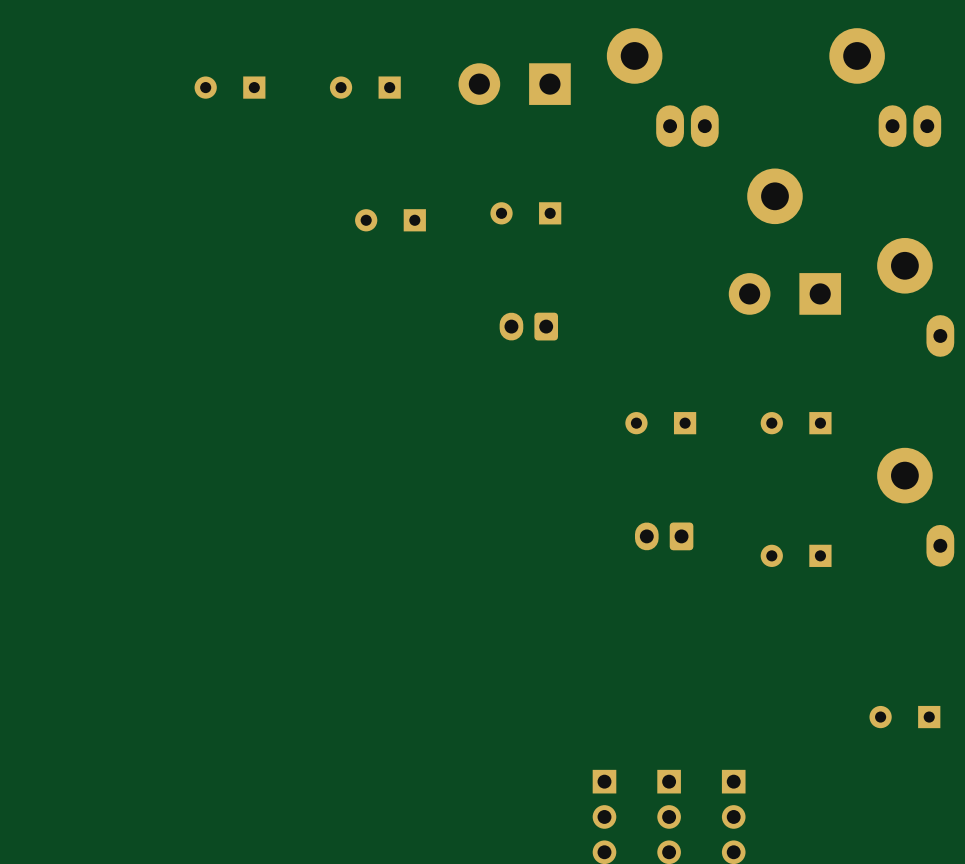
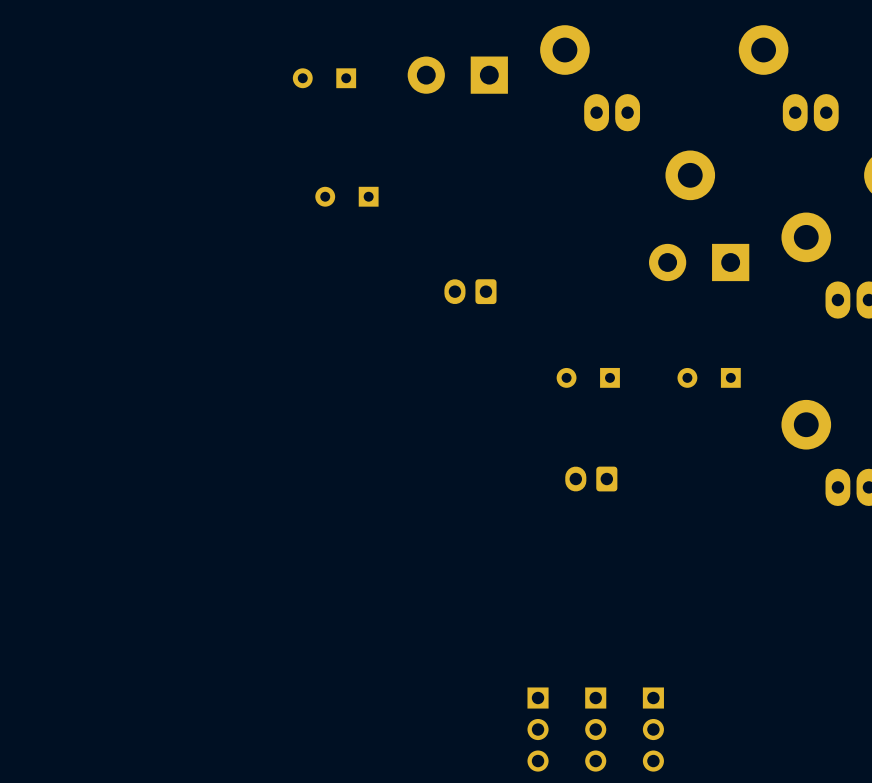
part: (230, 87) -> none
part: (525, 213) -> none
part: (796, 555) -> none
part: (904, 717) -> none

